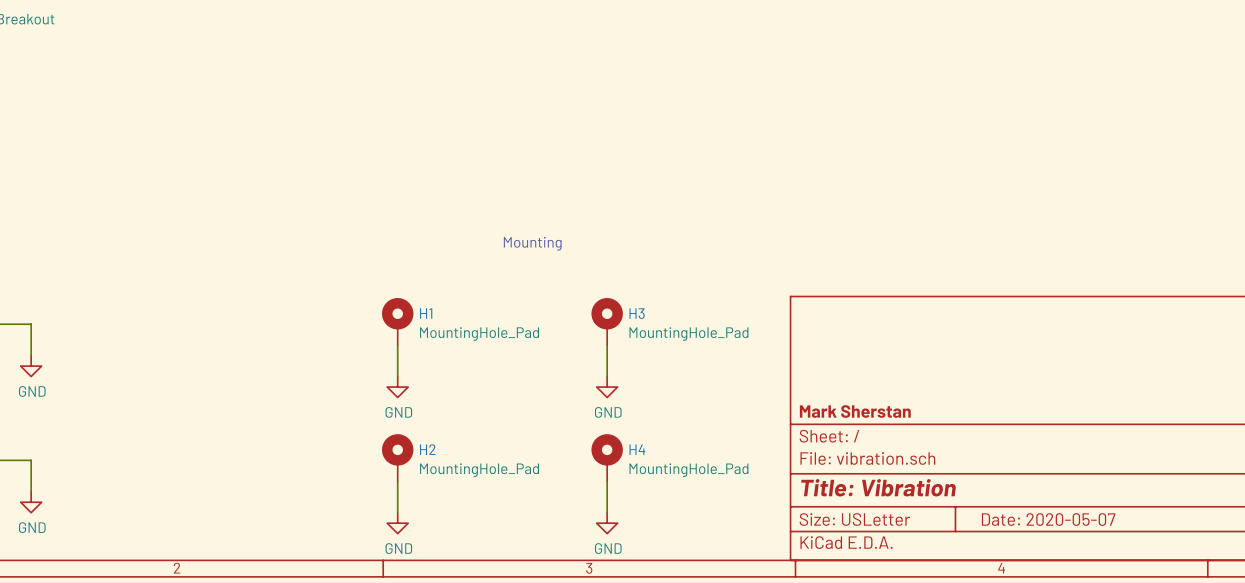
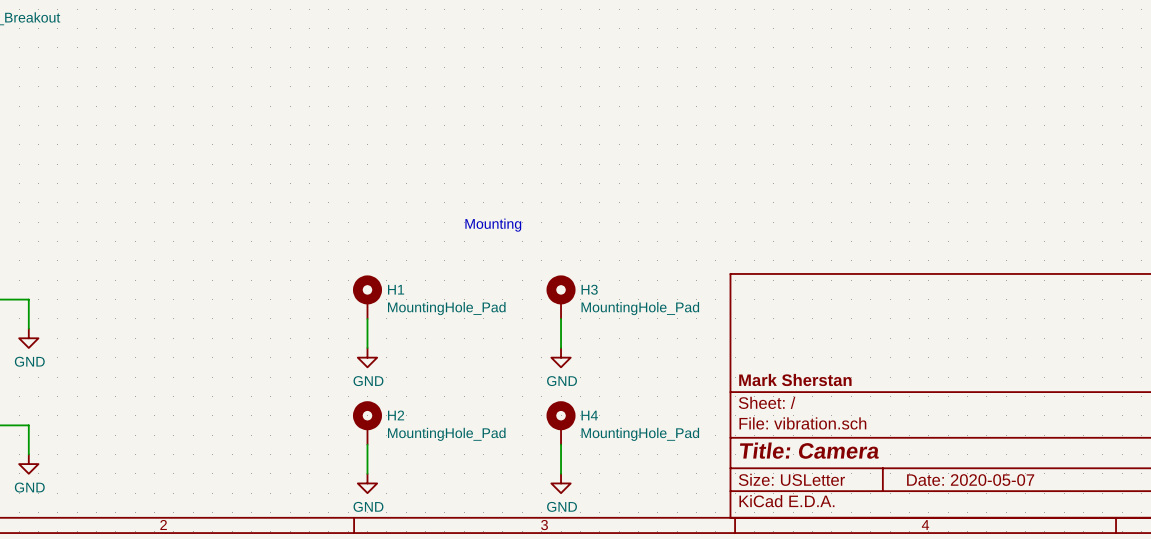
title block: Title: Vibration (878, 487) -> Title: Camera (809, 450)

